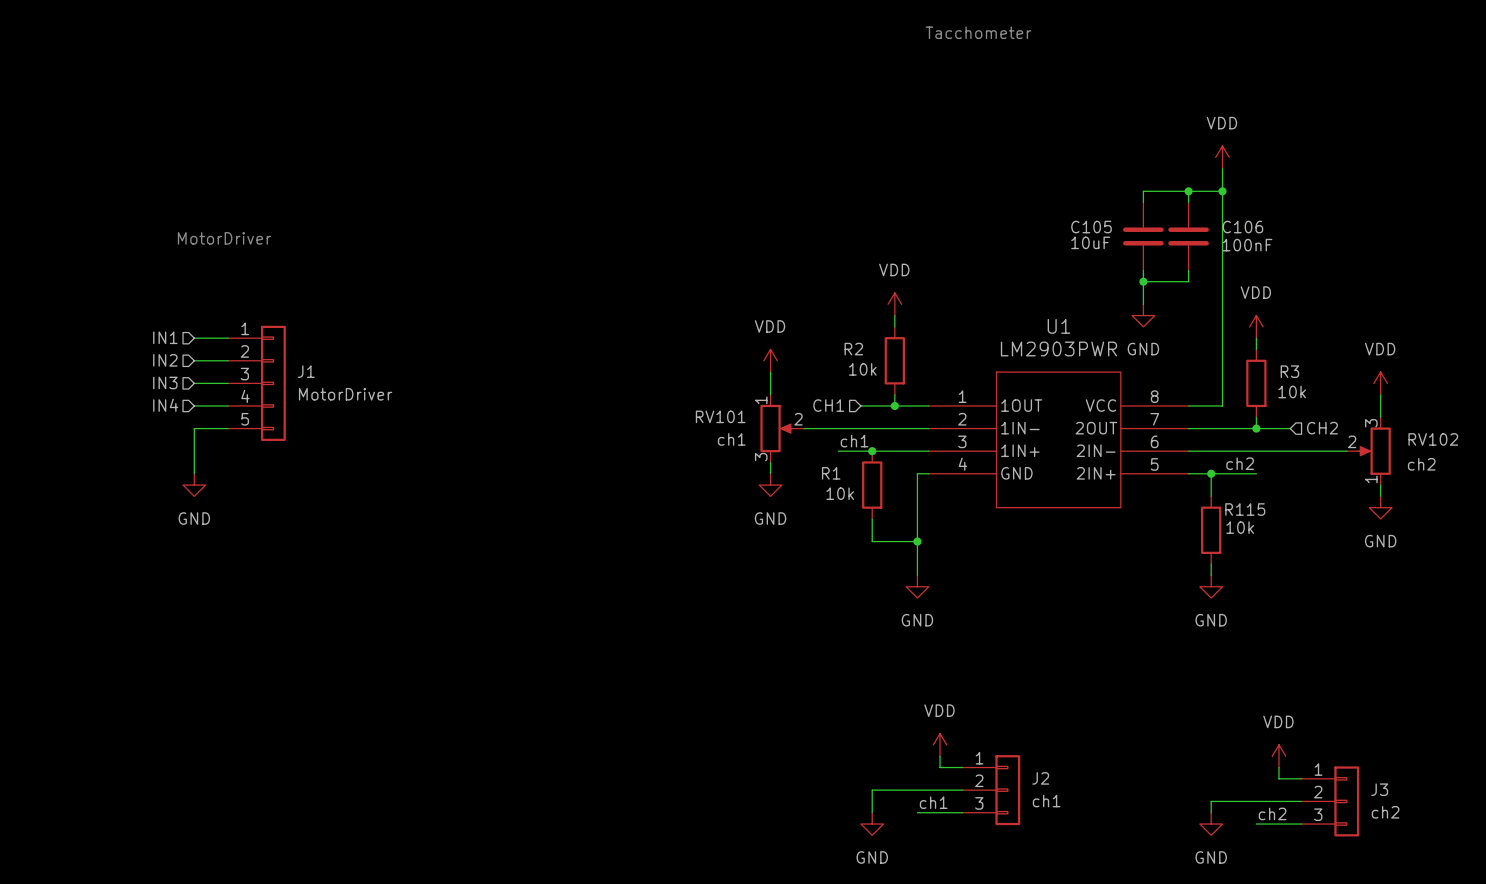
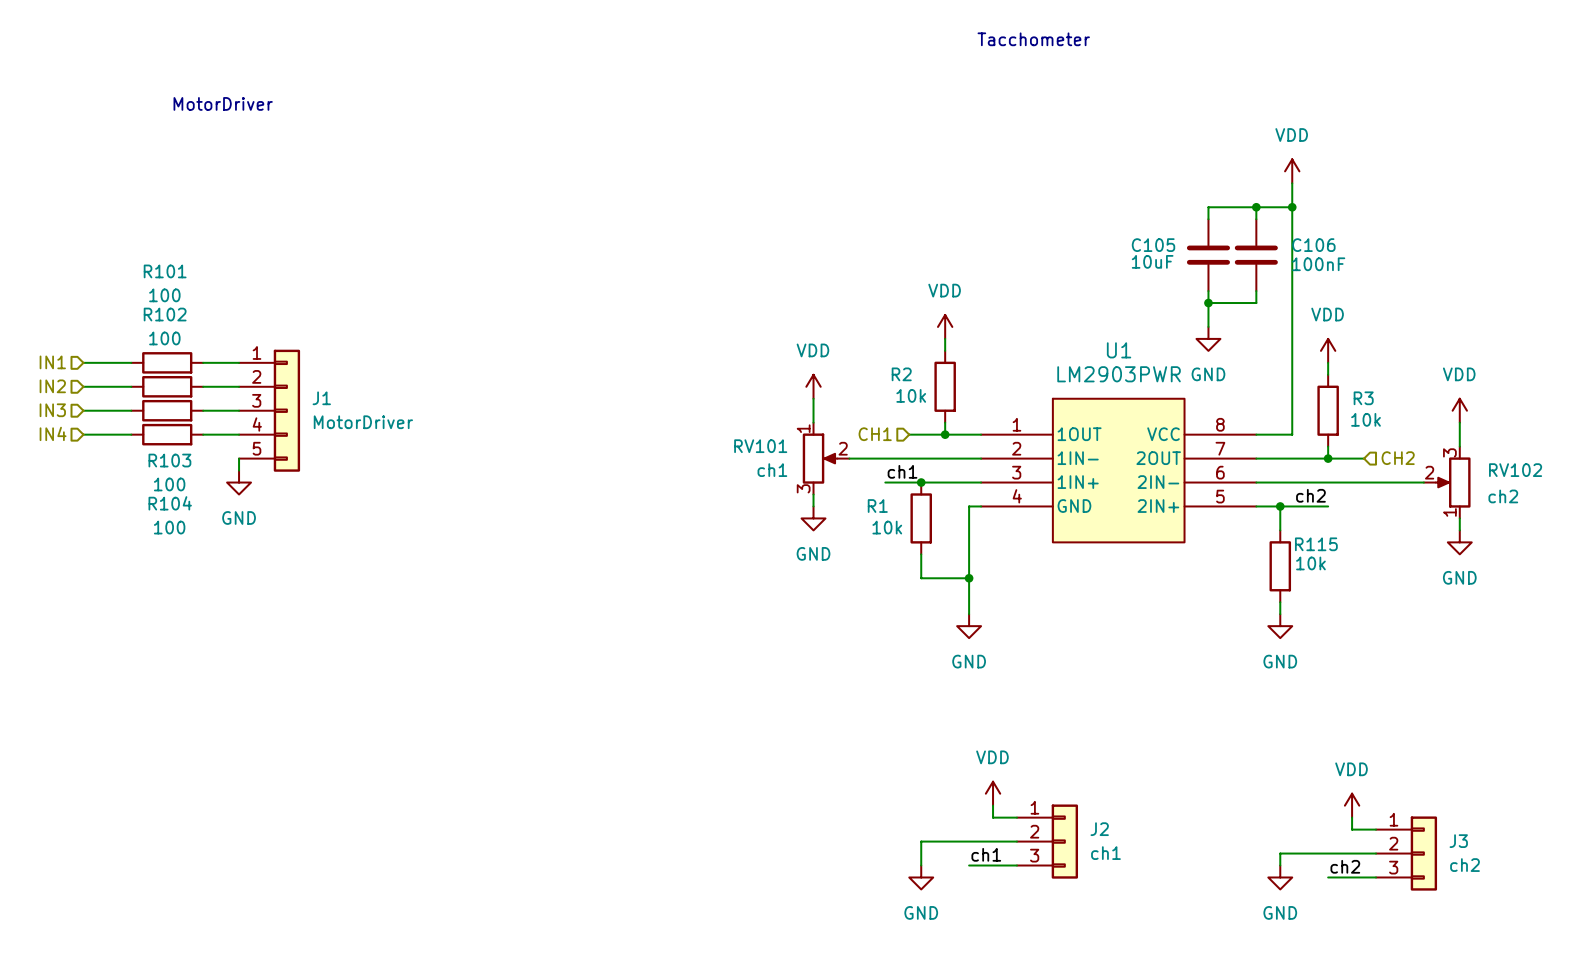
text position: MotorDriver (224, 238) -> MotorDriver (223, 103)
hierarchical label position: IN1 (165, 337) -> IN1 (52, 362)
wire: none -> (83, 362) (131, 362)
R101: none -> 100 (167, 362)
wire: none -> (83, 386) (131, 386)
R102: none -> 100 (167, 386)
hierarchical label position: IN2 (165, 360) -> IN2 (52, 386)
hierarchical label position: IN3 (165, 382) -> IN3 (52, 410)
wire: none -> (83, 410) (131, 410)
R103: none -> 100 (167, 410)
wire: none -> (83, 434) (131, 434)
R104: none -> 100 (167, 434)
hierarchical label position: IN4 (165, 405) -> IN4 (53, 433)
wire: (228, 428) (194, 428) (194, 473) -> (239, 458) (239, 470)
power symbol position: GND (194, 485) -> GND (239, 482)

